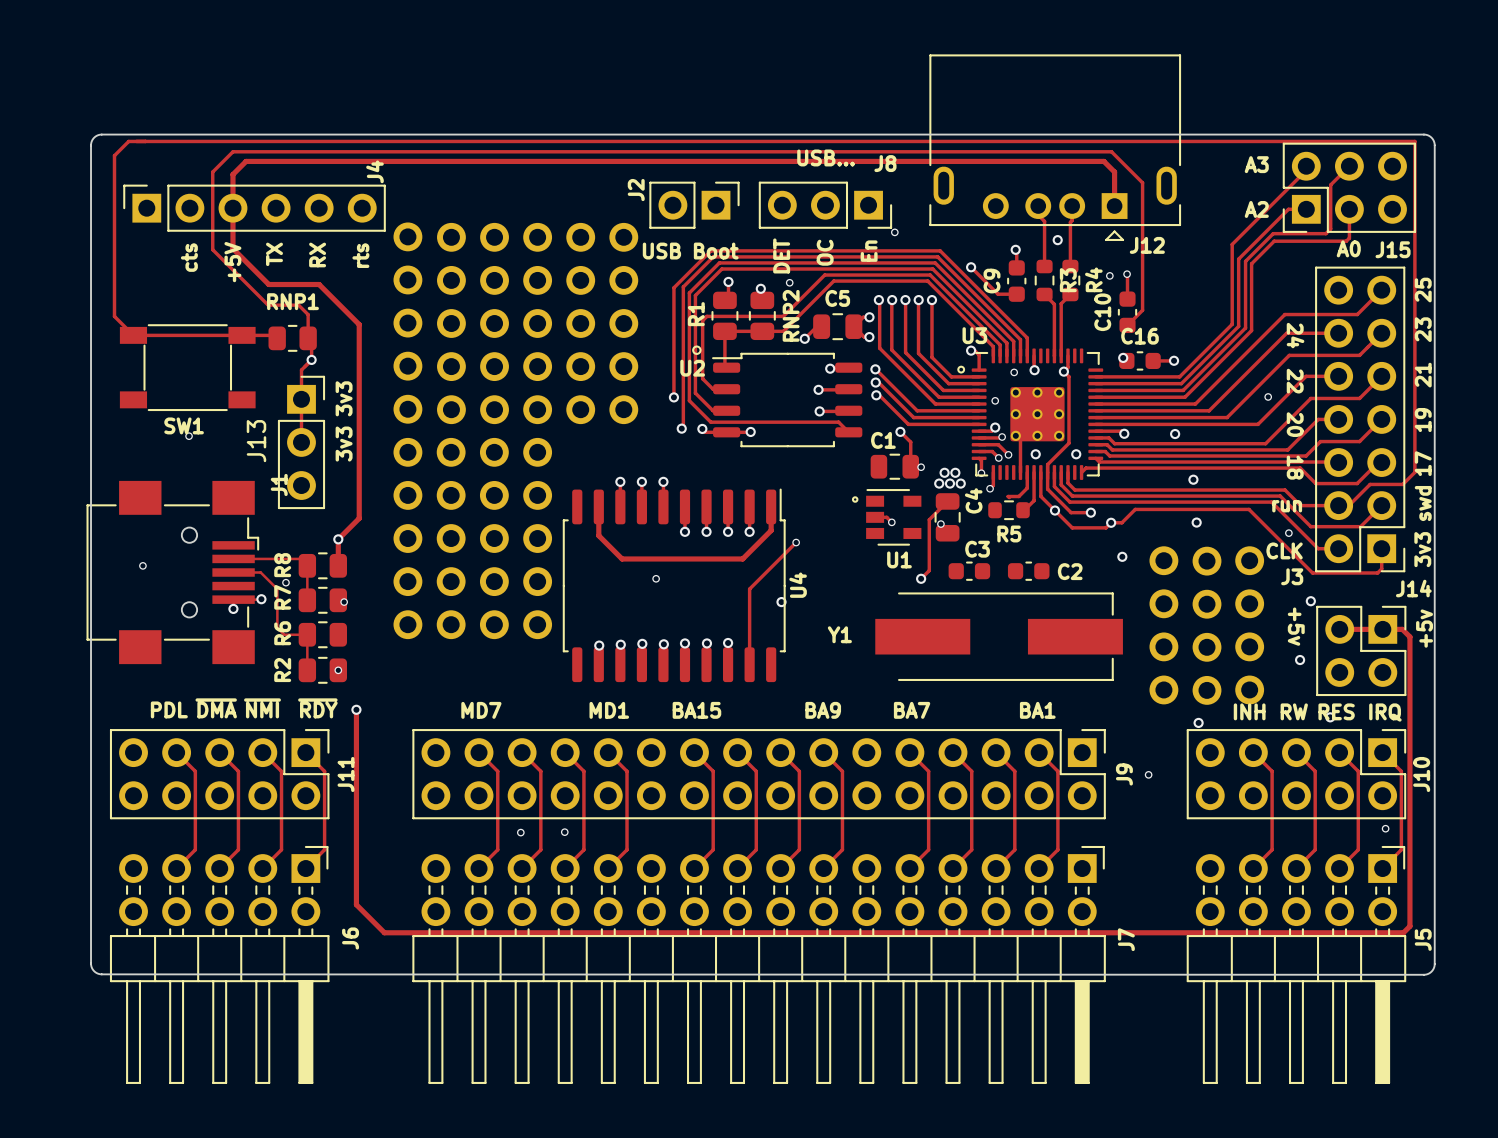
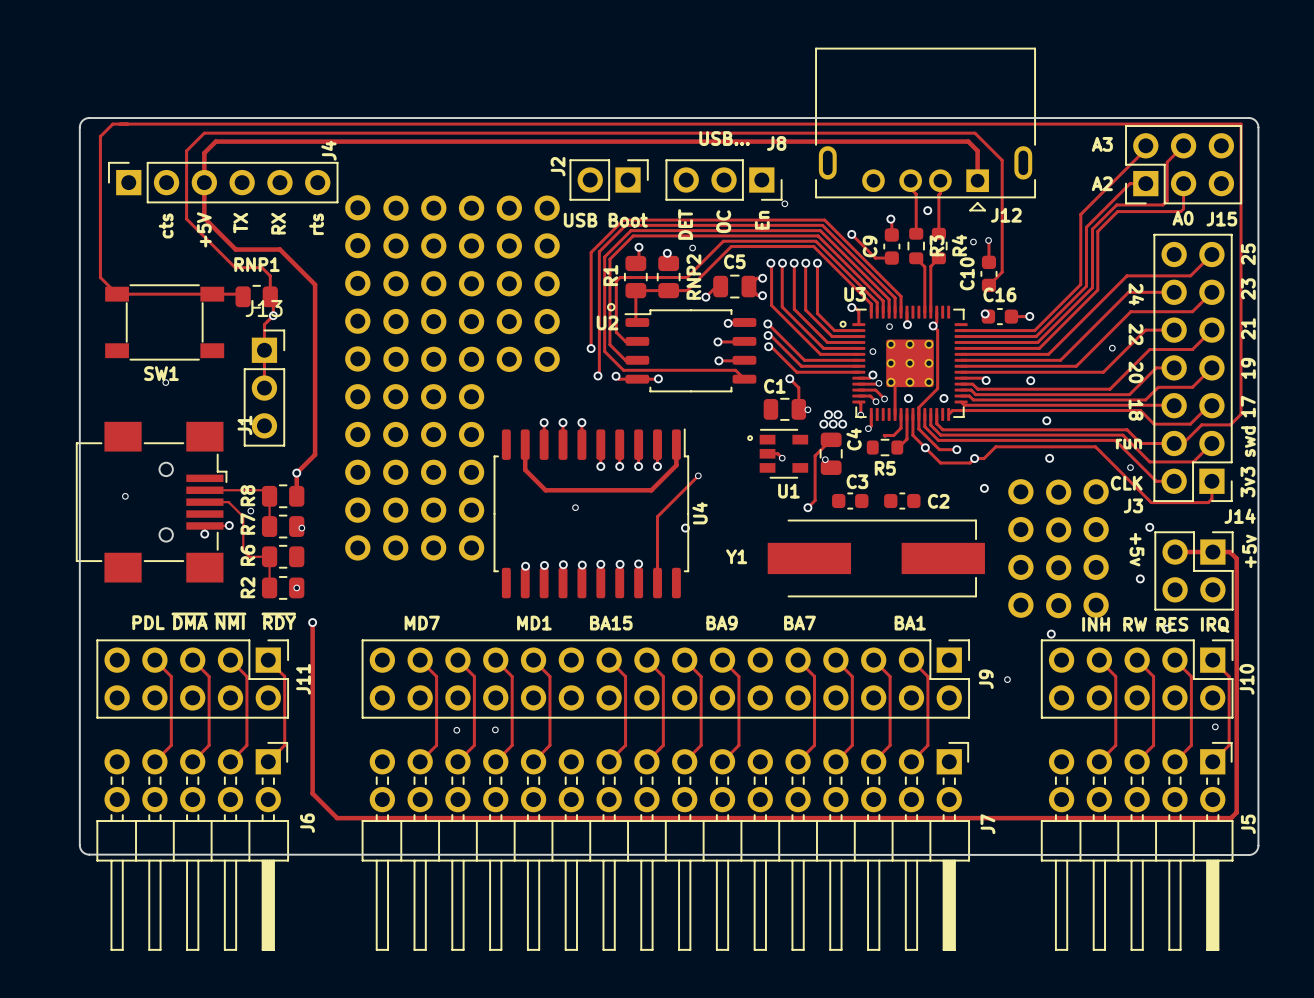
text: 3v3 (344, 398) -> none
J13 name rotation: 0° (256, 441) -> 90° clockwise (264, 308)
J13 name position: J13 (256, 441) -> J13 (264, 308)
text: 3v3 (344, 444) -> none

